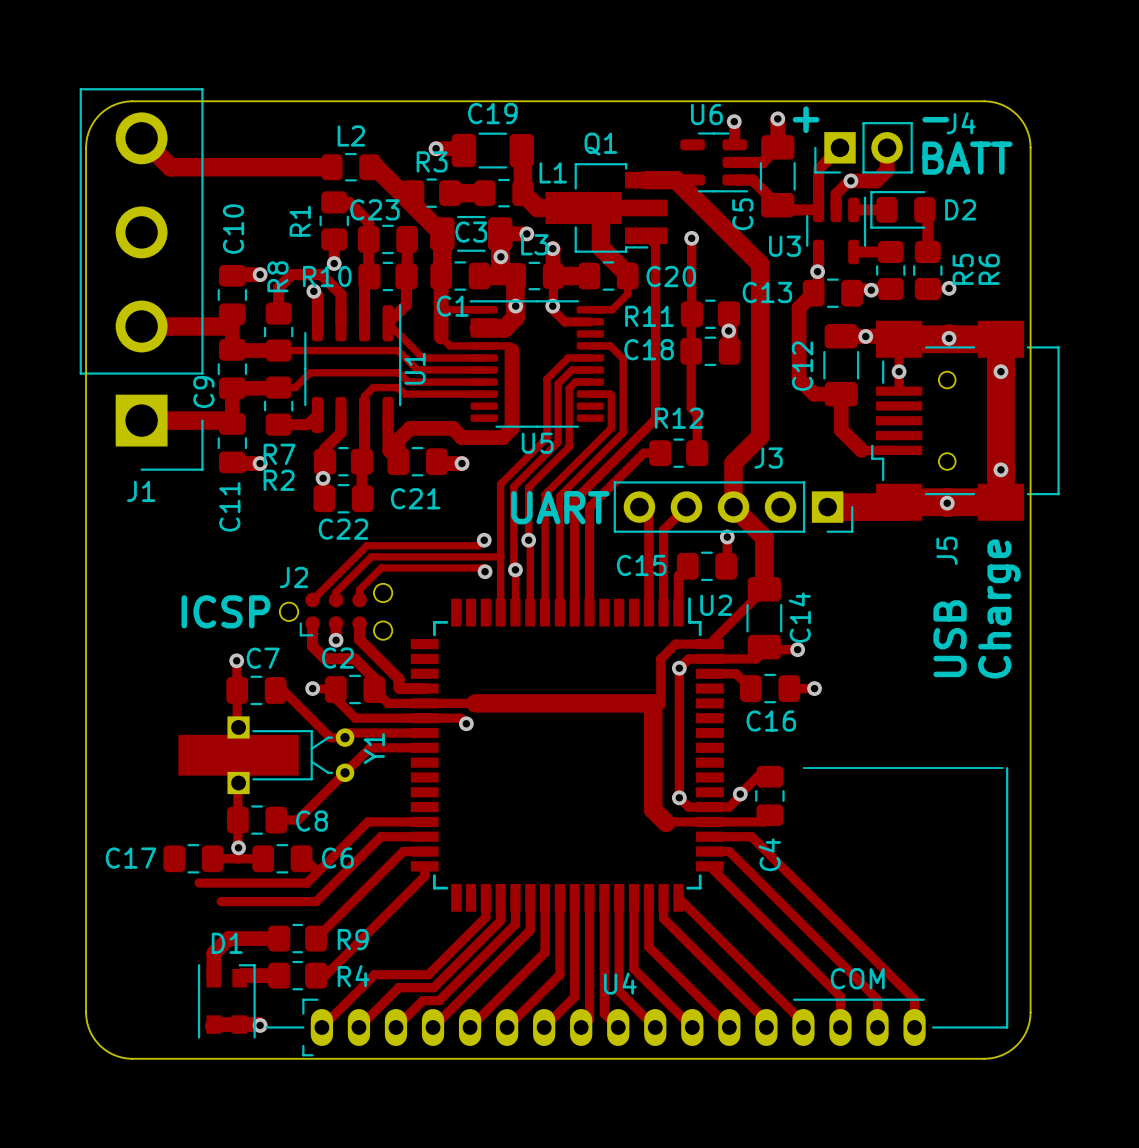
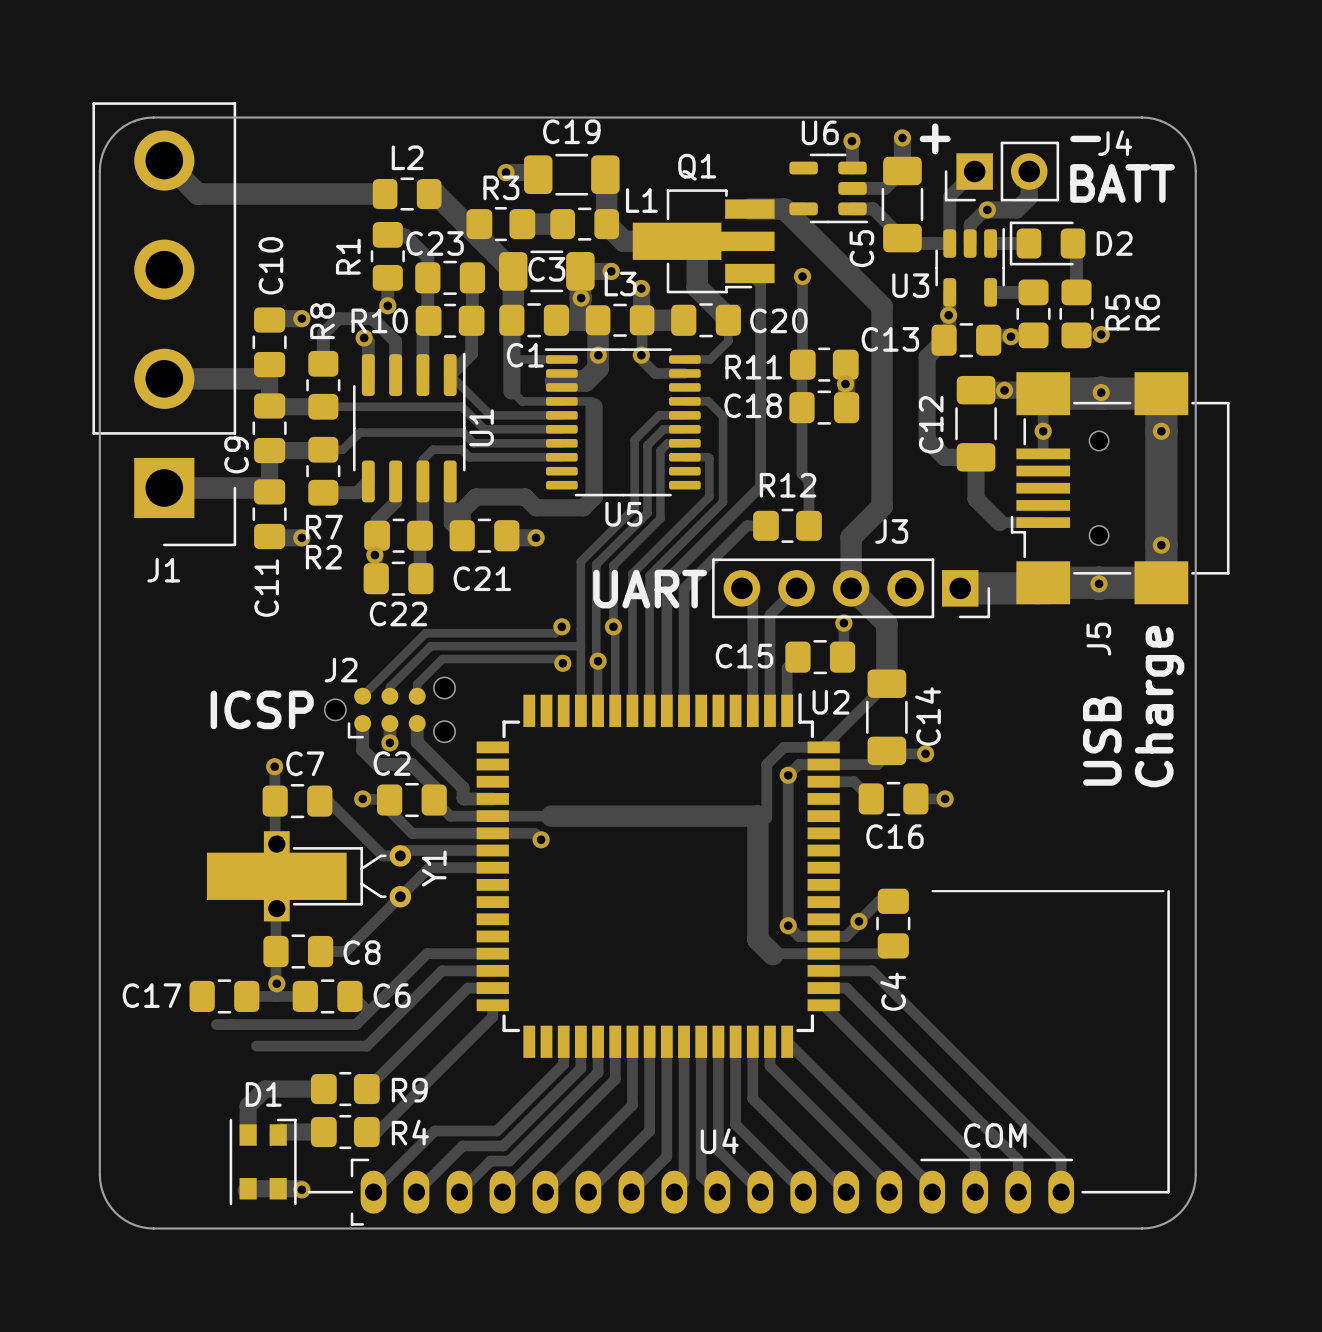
track: none -> (216, 1024) (230, 1024)

